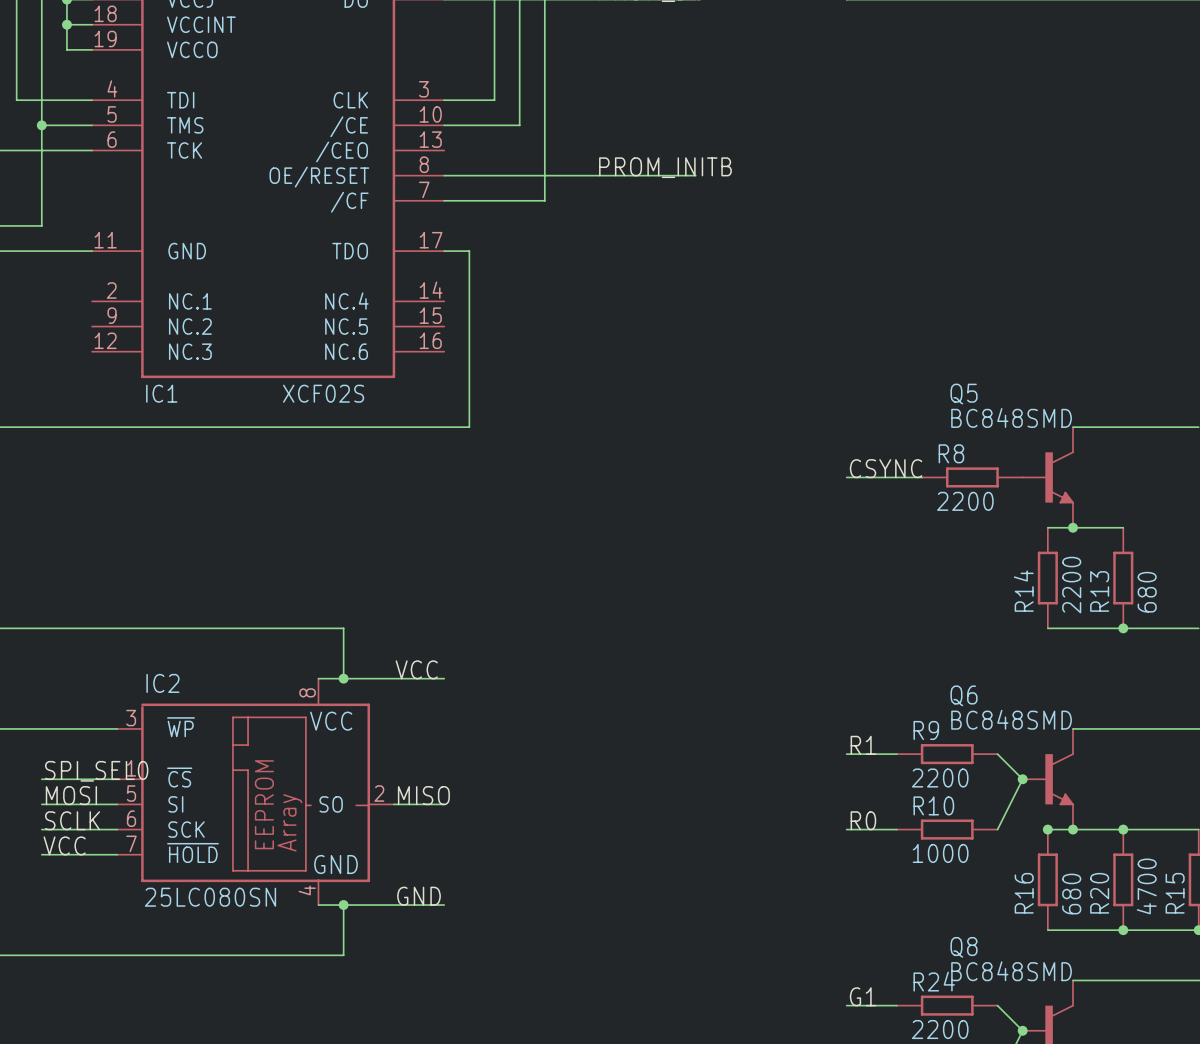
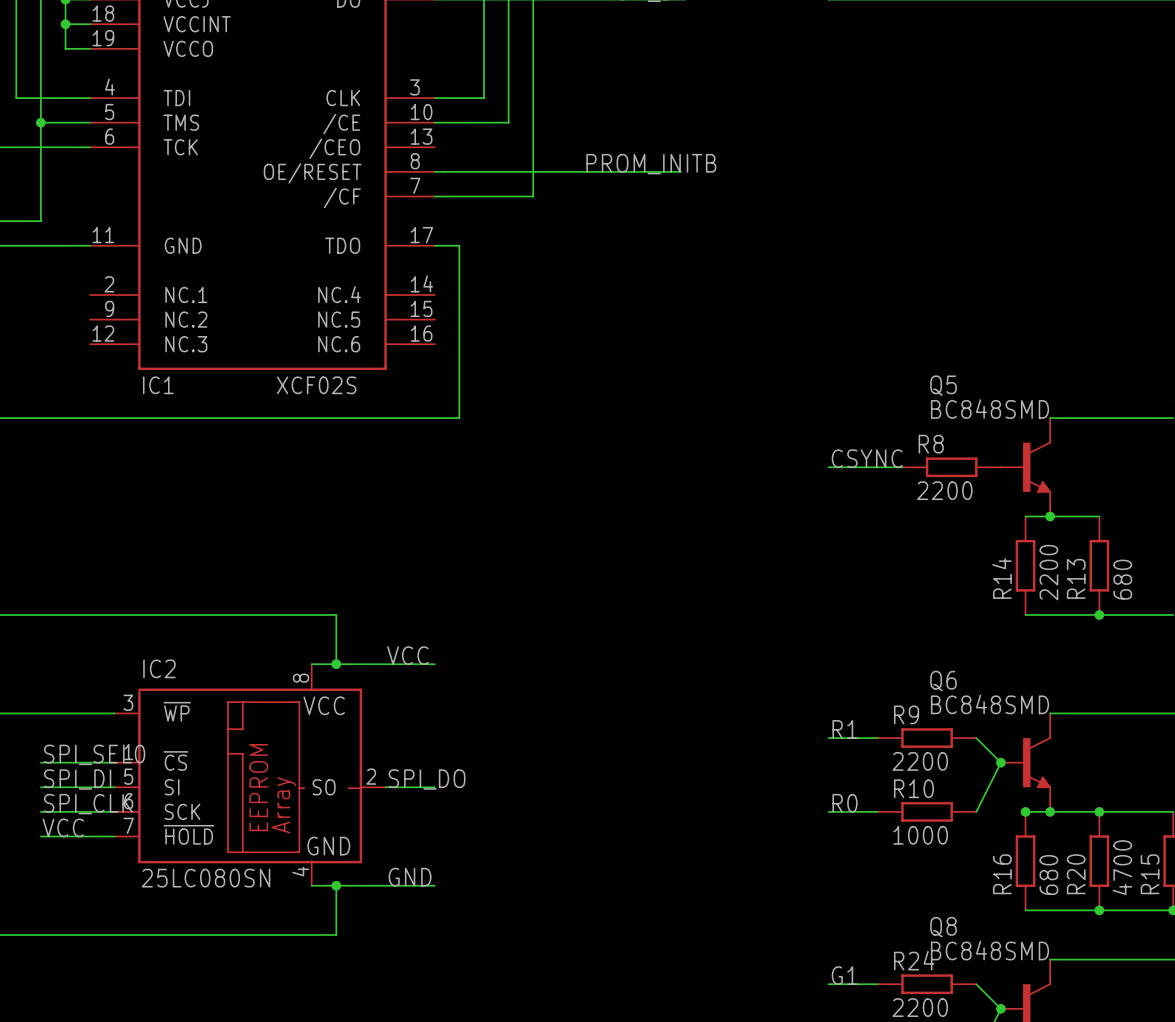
label: MOSI (71, 795) -> SPI_DI (77, 779)
label: MISO (423, 795) -> SPI_DO (427, 779)
label: SCLK (72, 820) -> SPI_CLK (88, 804)

